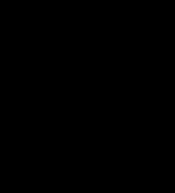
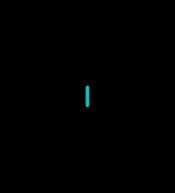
line: none -> (87, 87) (87, 105)

